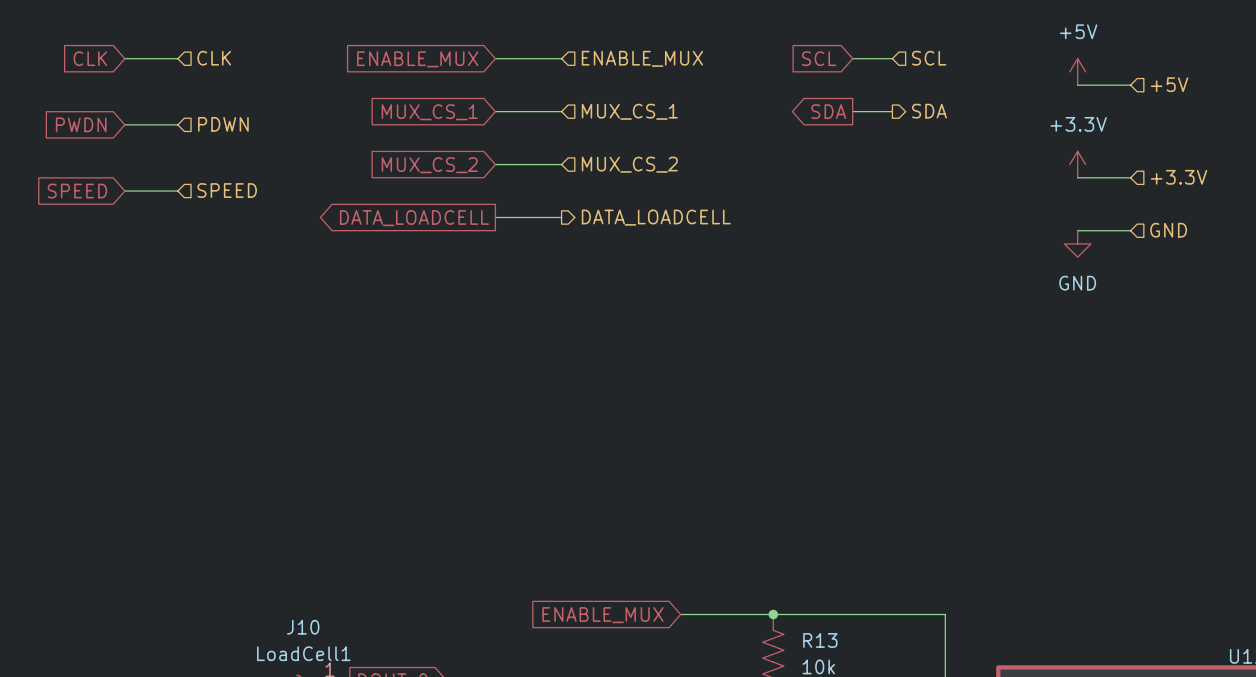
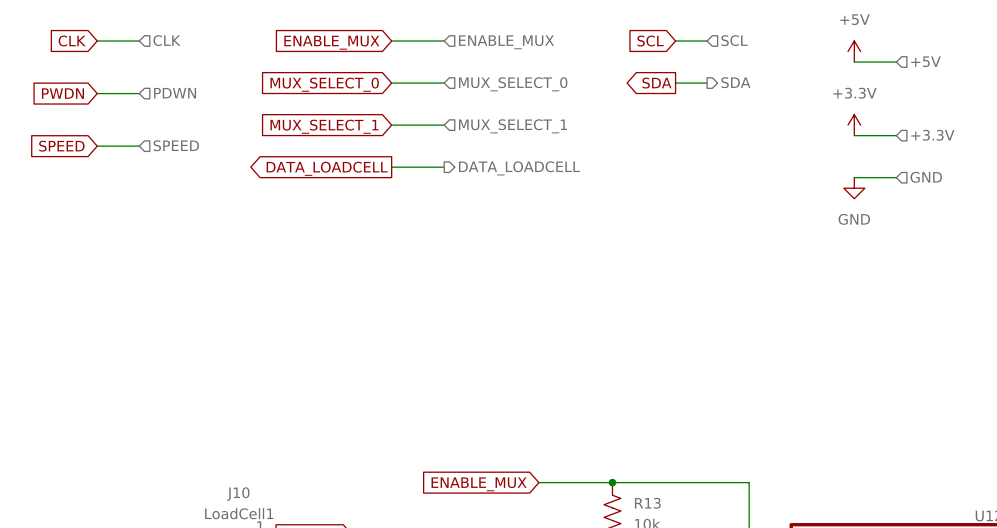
hierarchical label: MUX_CS_1 (629, 111) -> MUX_SELECT_0 (513, 84)
global label: MUX_CS_1 (429, 112) -> MUX_SELECT_0 (324, 84)
hierarchical label: MUX_CS_2 (629, 164) -> MUX_SELECT_1 (513, 126)
global label: MUX_CS_2 (429, 165) -> MUX_SELECT_1 (324, 126)

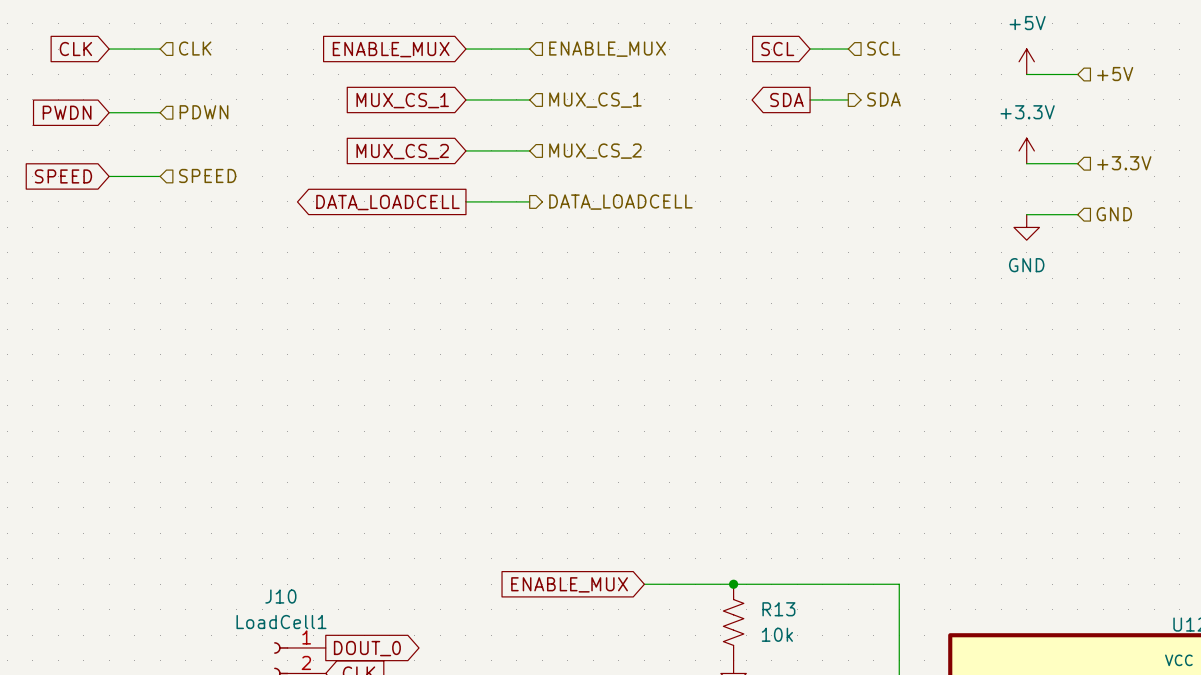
global label: MUX_SELECT_0 (324, 84) -> MUX_CS_1 (402, 100)
hierarchical label: MUX_SELECT_0 (513, 84) -> MUX_CS_1 (595, 100)
global label: MUX_SELECT_1 (324, 126) -> MUX_CS_2 (402, 151)
hierarchical label: MUX_SELECT_1 (513, 126) -> MUX_CS_2 (595, 151)

